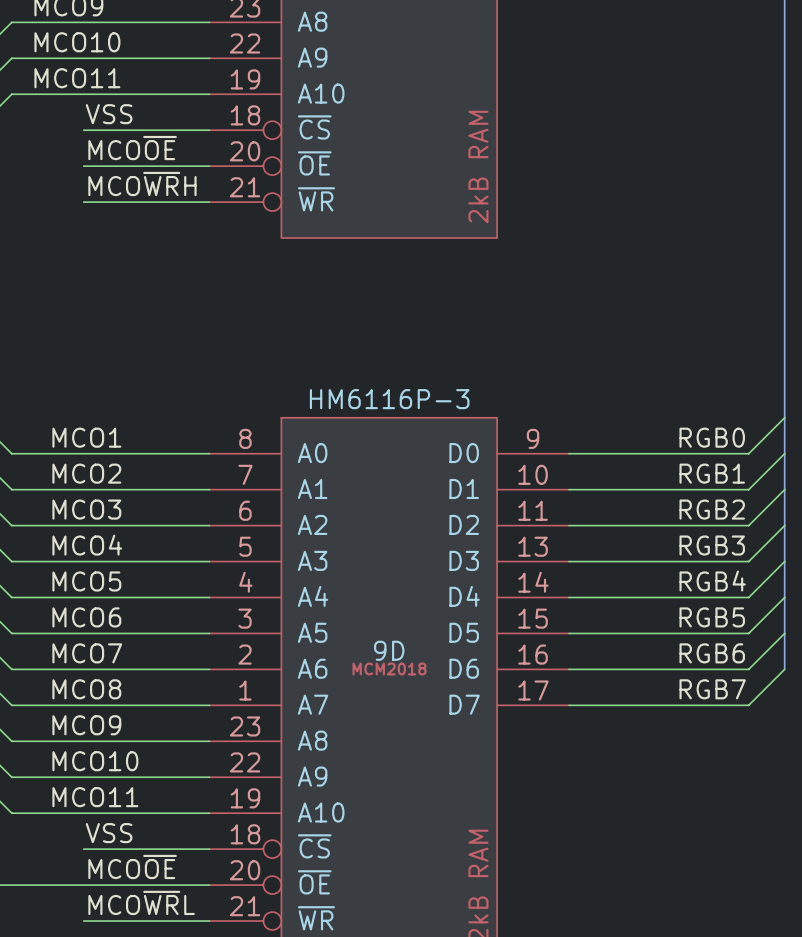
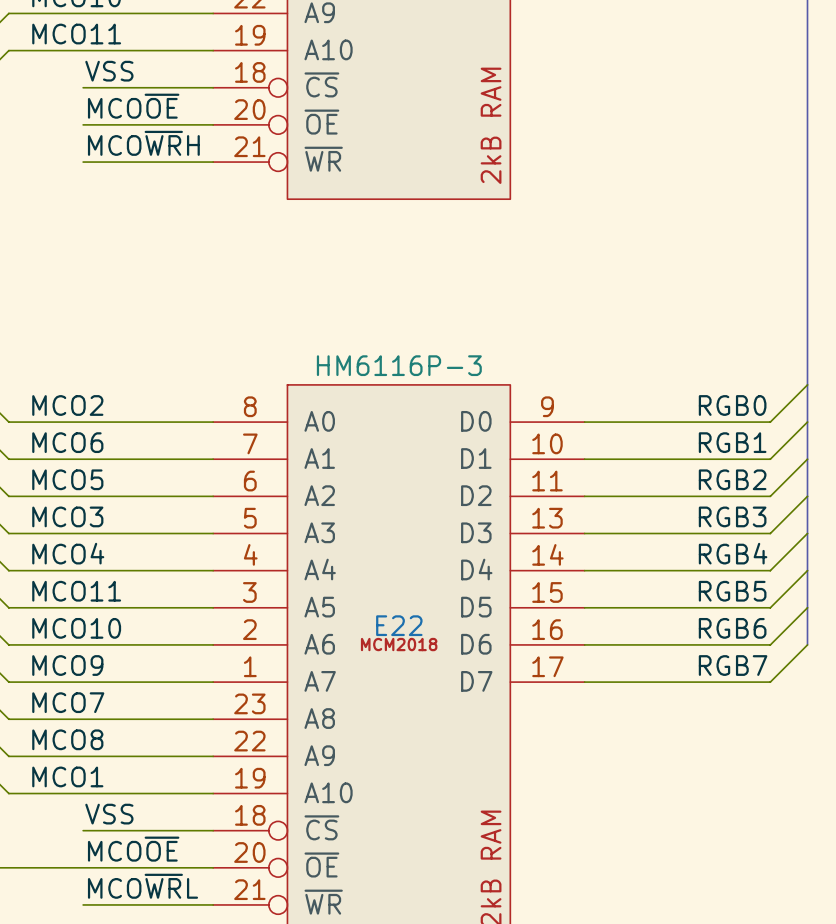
label: MCO1 (86, 437) -> none
label position: MCO2 (86, 473) -> MCO2 (67, 405)
label position: MCO3 (86, 509) -> MCO3 (67, 516)
label position: MCO4 (87, 545) -> MCO4 (68, 553)
label position: MCO5 (86, 581) -> MCO5 (67, 479)
label position: MCO6 (86, 617) -> MCO6 (67, 442)
9D name: 9D (389, 650) -> E22 (399, 625)
label position: MCO7 (87, 653) -> MCO7 (68, 702)
label position: MCO8 (86, 689) -> MCO8 (67, 739)
label position: MCO9 (86, 725) -> MCO9 (67, 665)
label position: MCO10 (95, 761) -> MCO10 (76, 628)
label: none -> MCO1 (67, 776)
label position: MCO11 (95, 797) -> MCO11 (76, 591)

